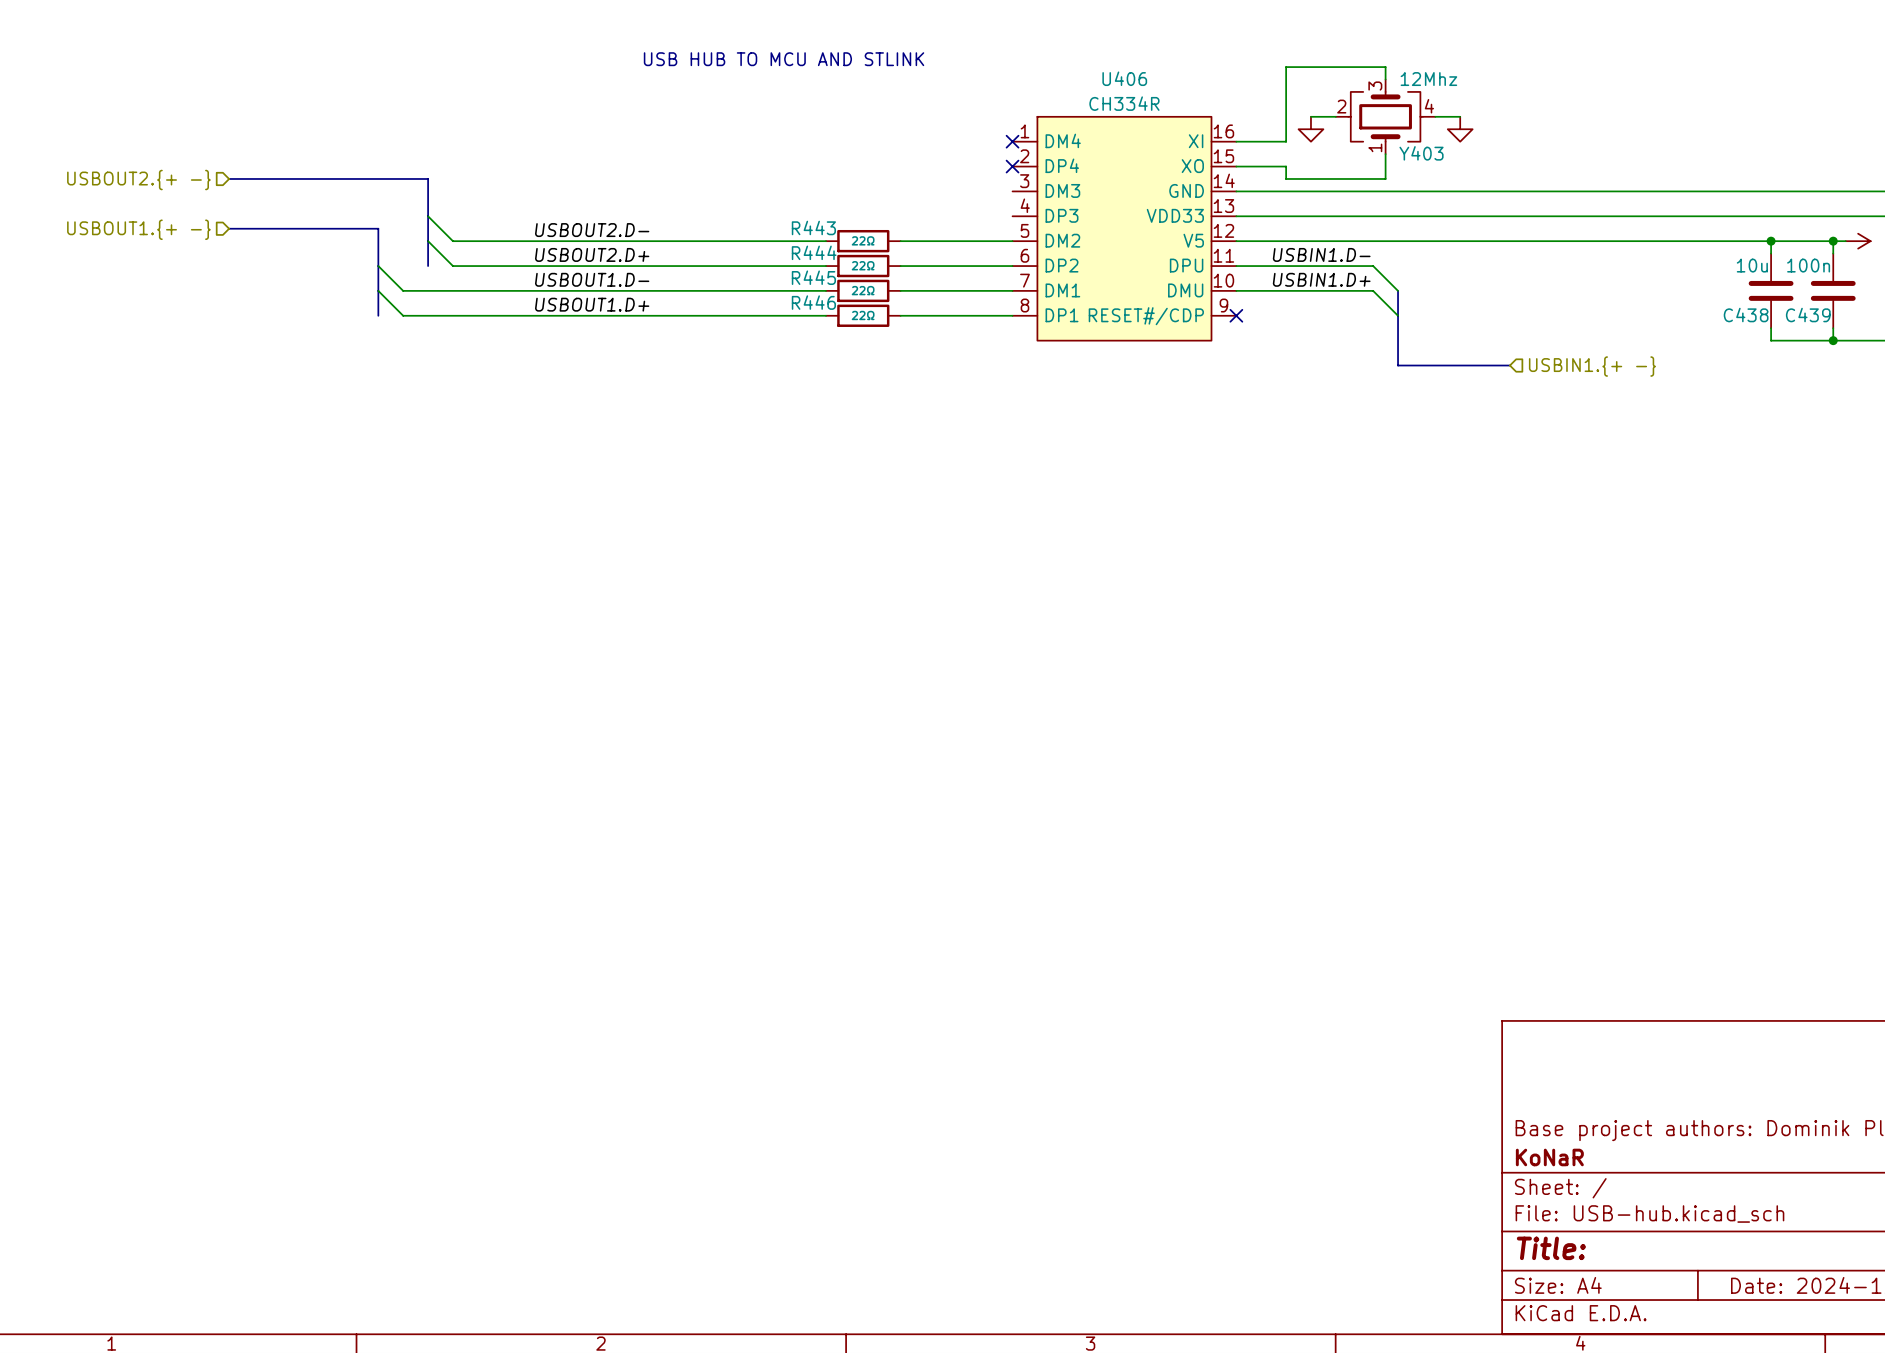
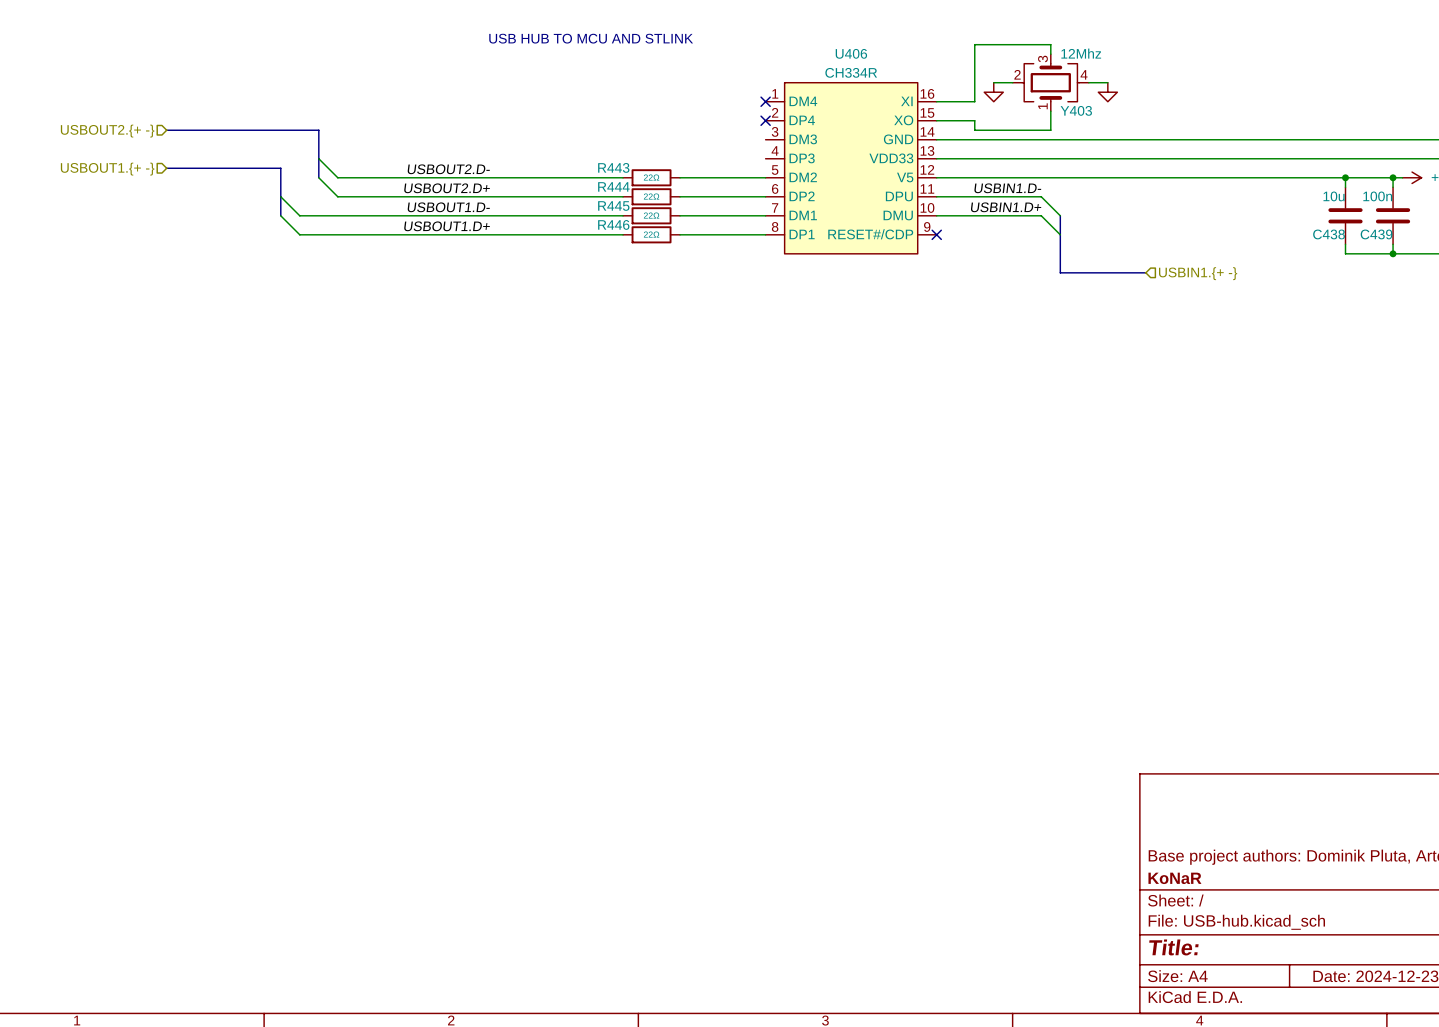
bus: (428, 241) (428, 266) -> none
bus: (378, 290) (378, 315) -> none

